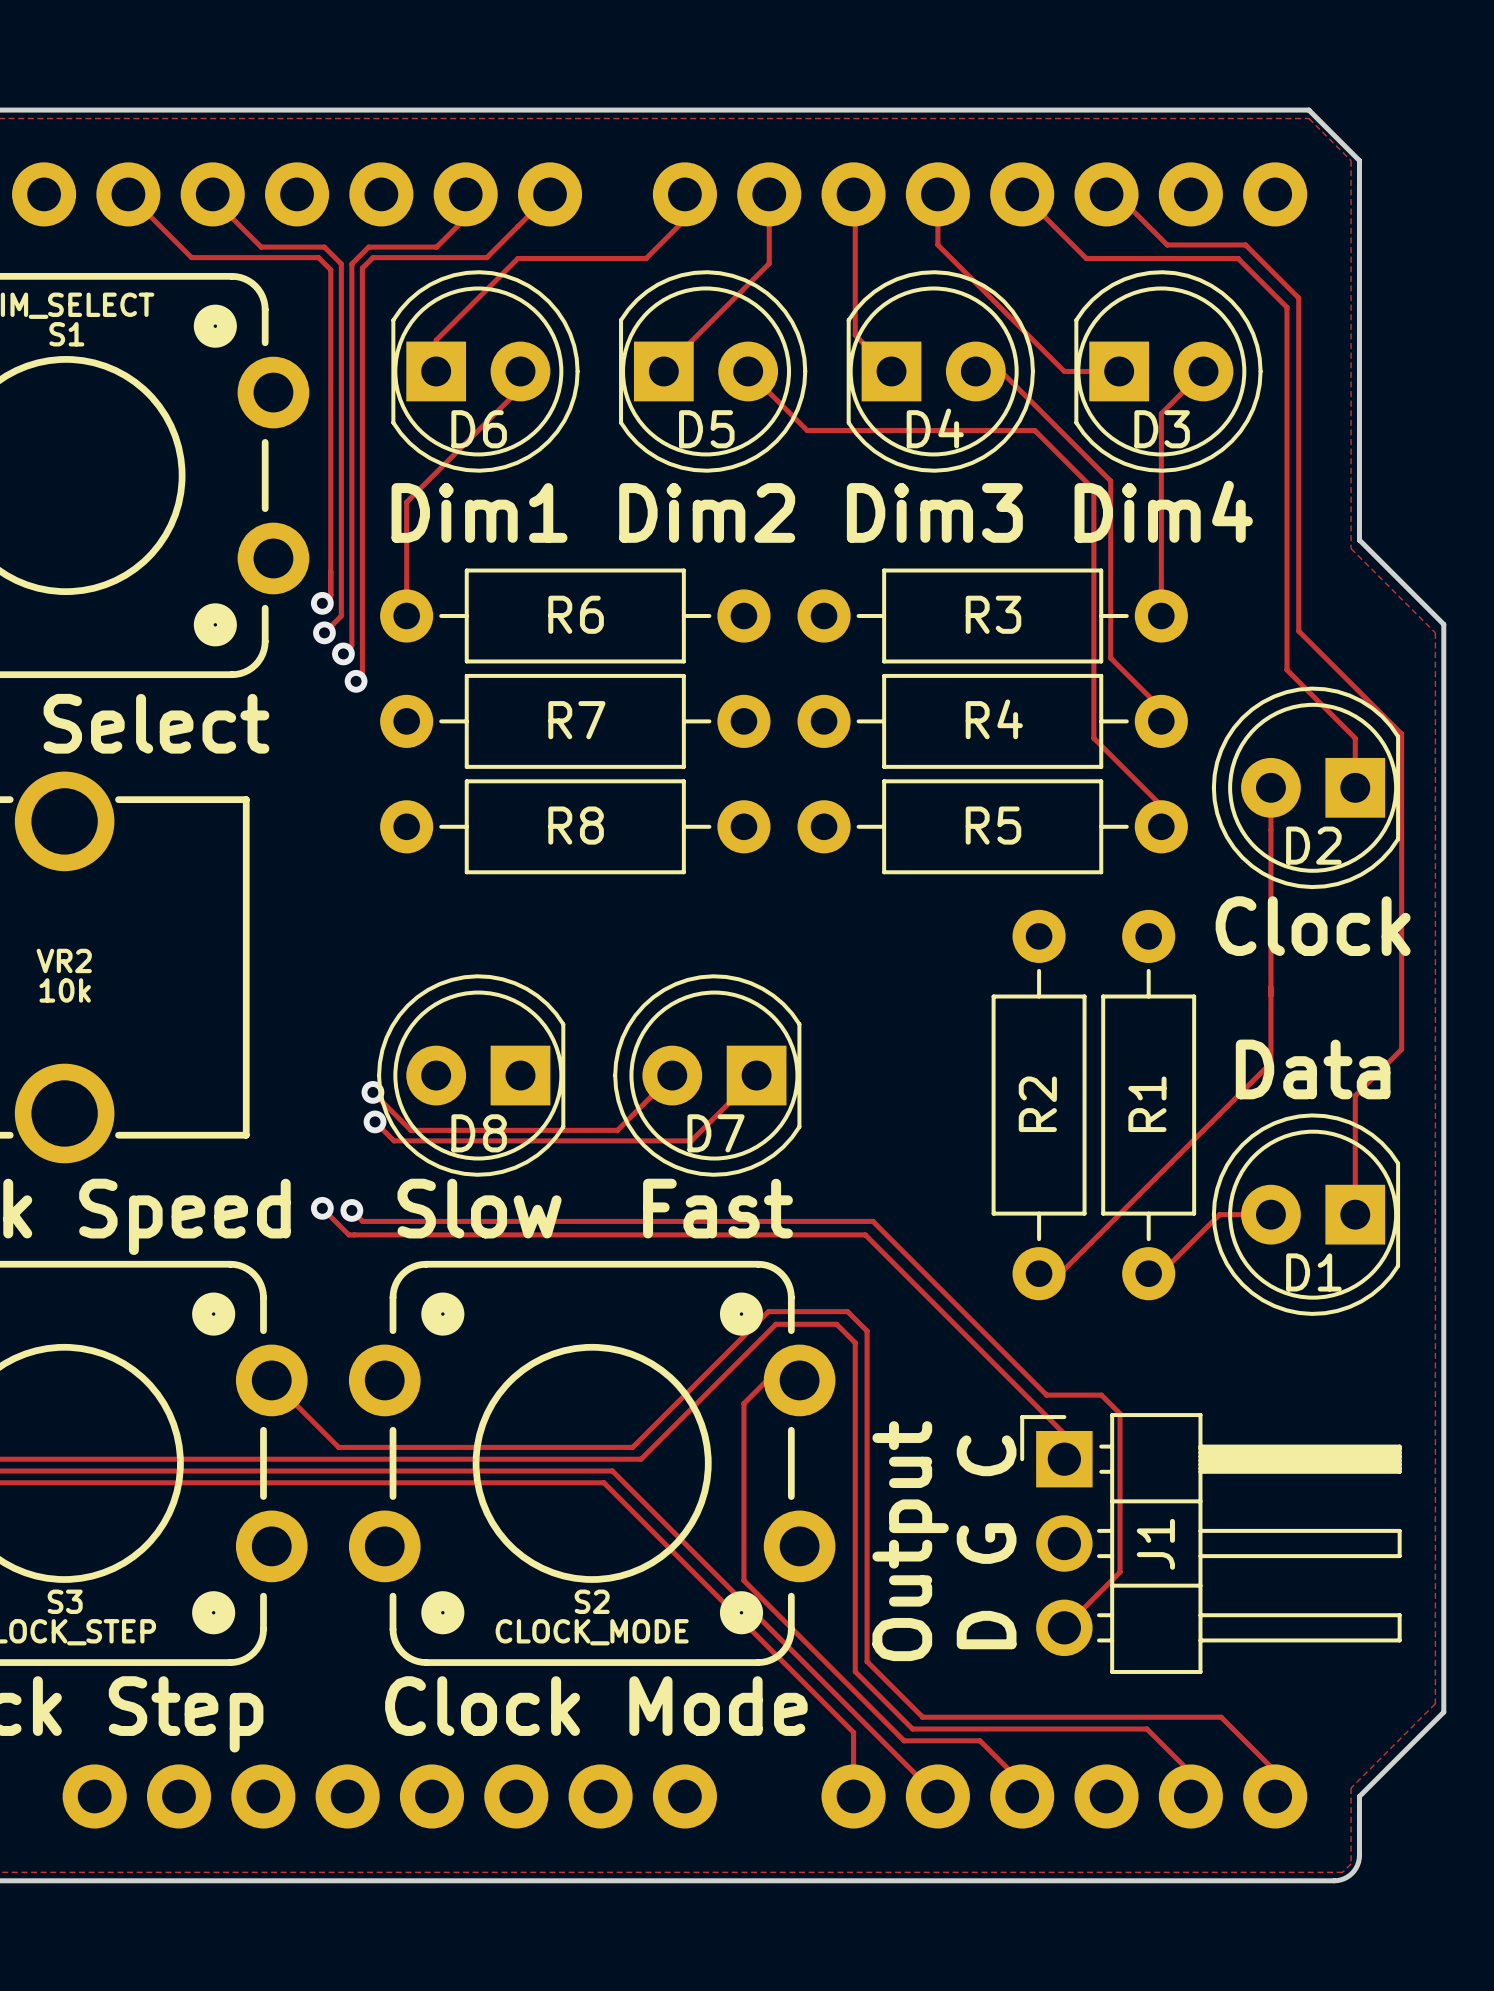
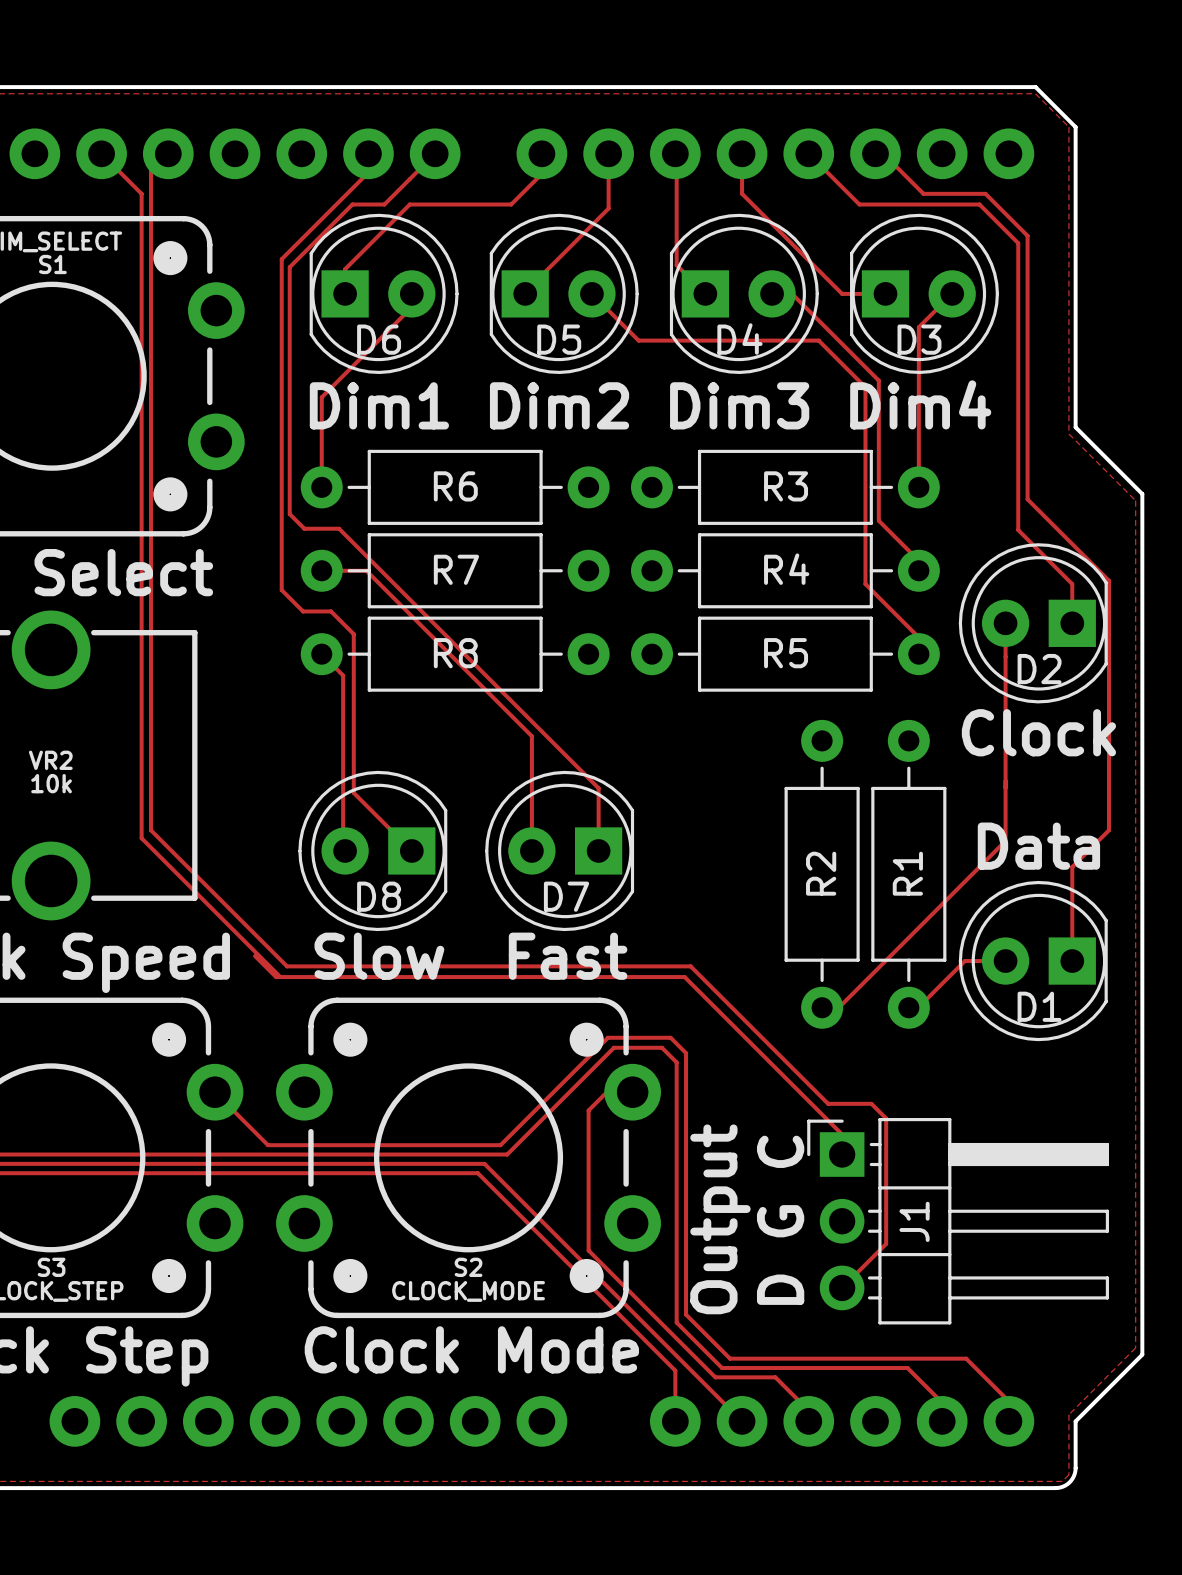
track: none -> (168, 153) (150, 171) (150, 830) (278, 957)
track: (212, 198) (261, 247) (324, 247) (341, 263) (341, 615) (324, 632) -> none
track: (179, 244) (191, 257) (318, 257) (330, 269) (330, 597) -> (141, 193) (141, 838) (280, 977)
track: (436, 247) (368, 247) (351, 263) (351, 645) (343, 653) -> (345, 195) (281, 259) (281, 590) (303, 611) (331, 611) (353, 634) (353, 792) (411, 850)
track: (486, 257) (372, 257) (362, 268) (362, 675) (356, 681) -> (385, 203) (352, 204) (289, 267) (289, 514) (304, 528) (339, 528) (598, 788) (598, 850)
via: (322, 603) -> none
via: (324, 632) -> none
via: (343, 653) -> none
via: (356, 681) -> none
track: none -> (321, 654) (343, 675) (343, 848) (345, 850)
track: (672, 1075) (617, 1130) (410, 1130) (372, 1092) -> (531, 850) (531, 736) (366, 570) (321, 570)
track: (756, 1075) (691, 1140) (394, 1140) (375, 1121) -> none
via: (372, 1092) -> none
via: (375, 1121) -> none
via: (322, 1208) -> none
via: (351, 1210) -> none

